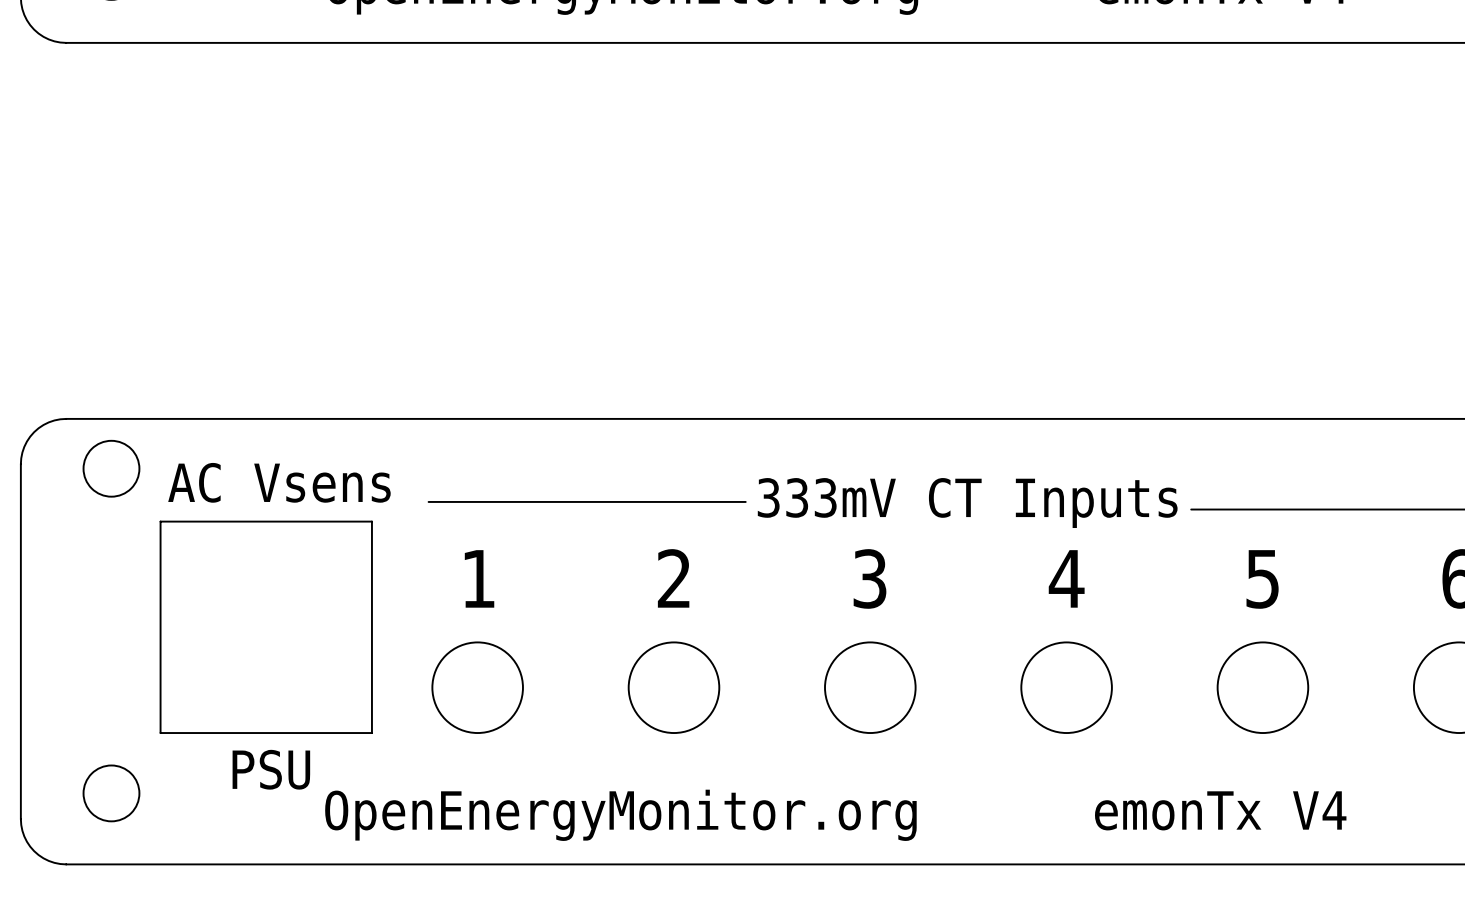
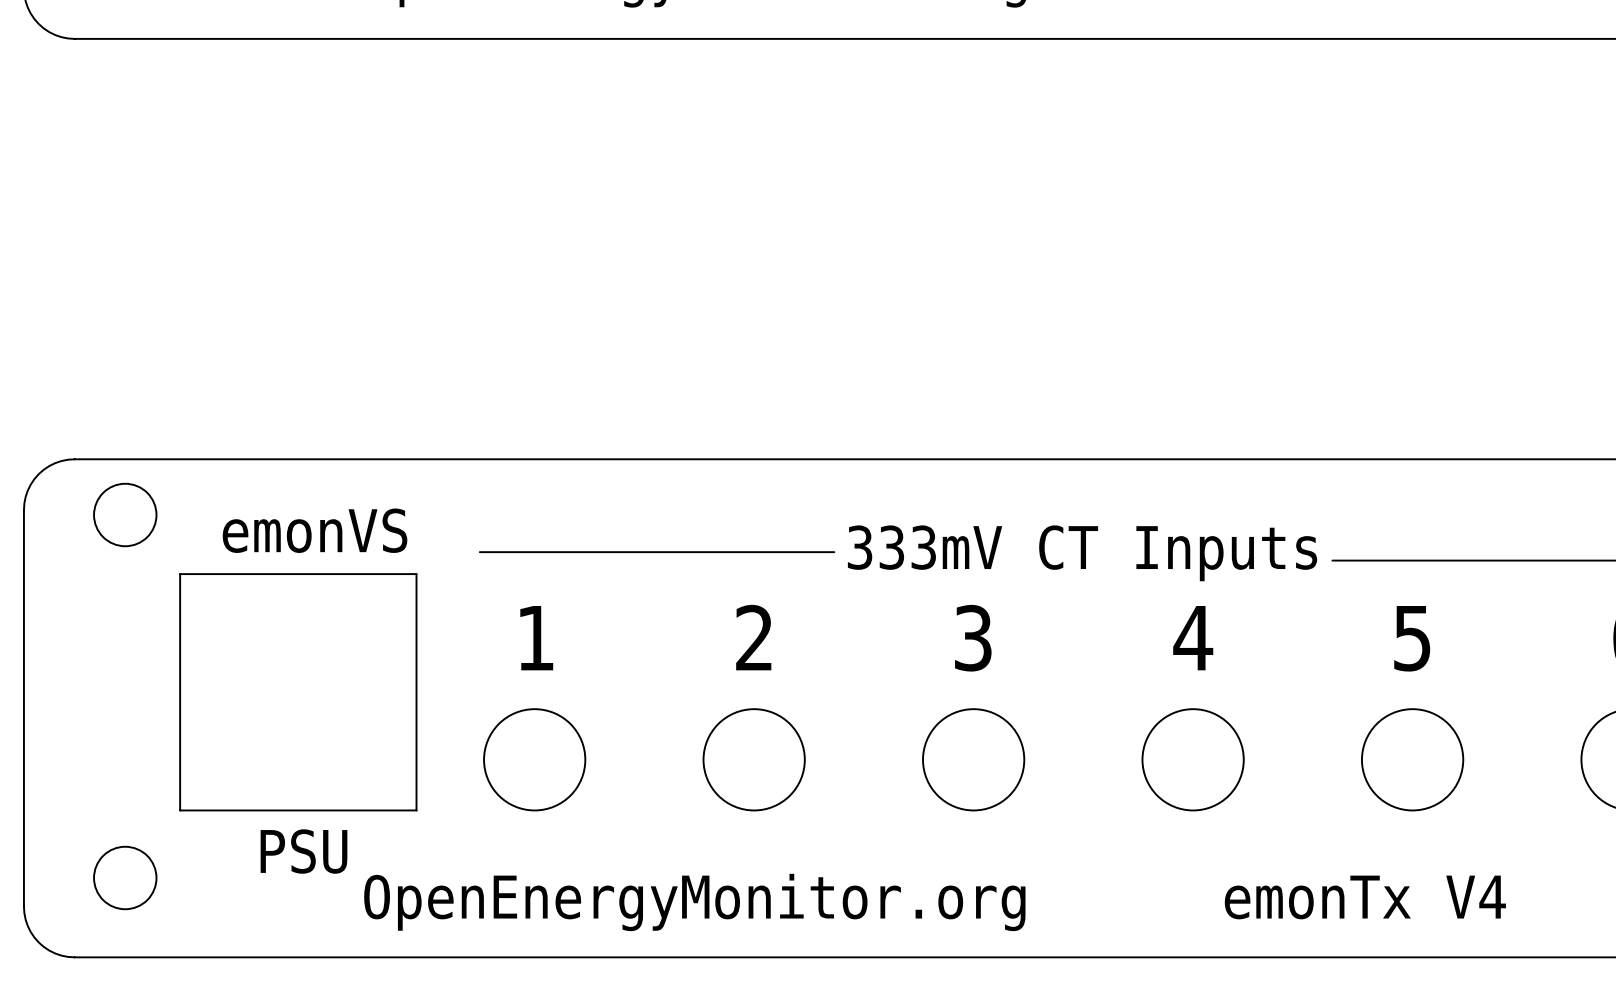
text: AC Vsens (279, 482) -> emonVS (315, 530)

